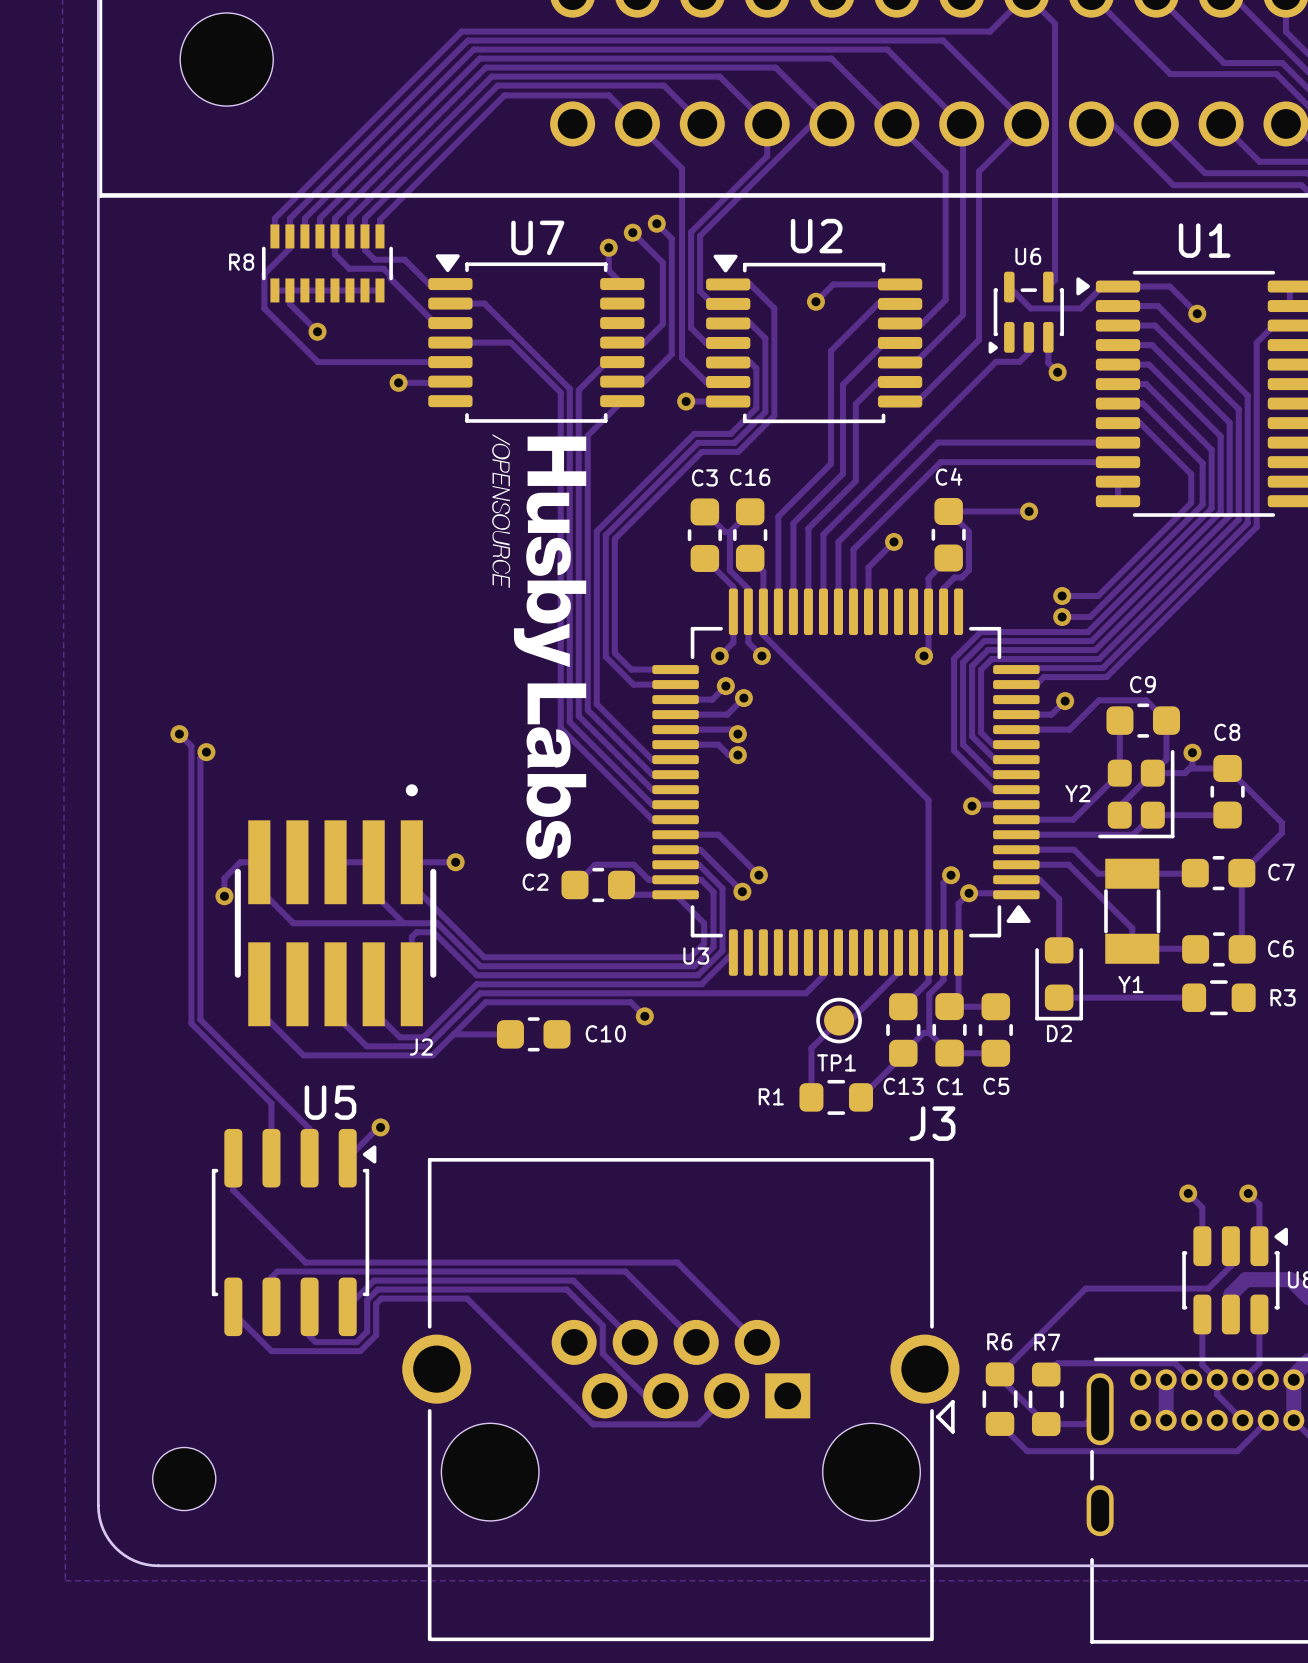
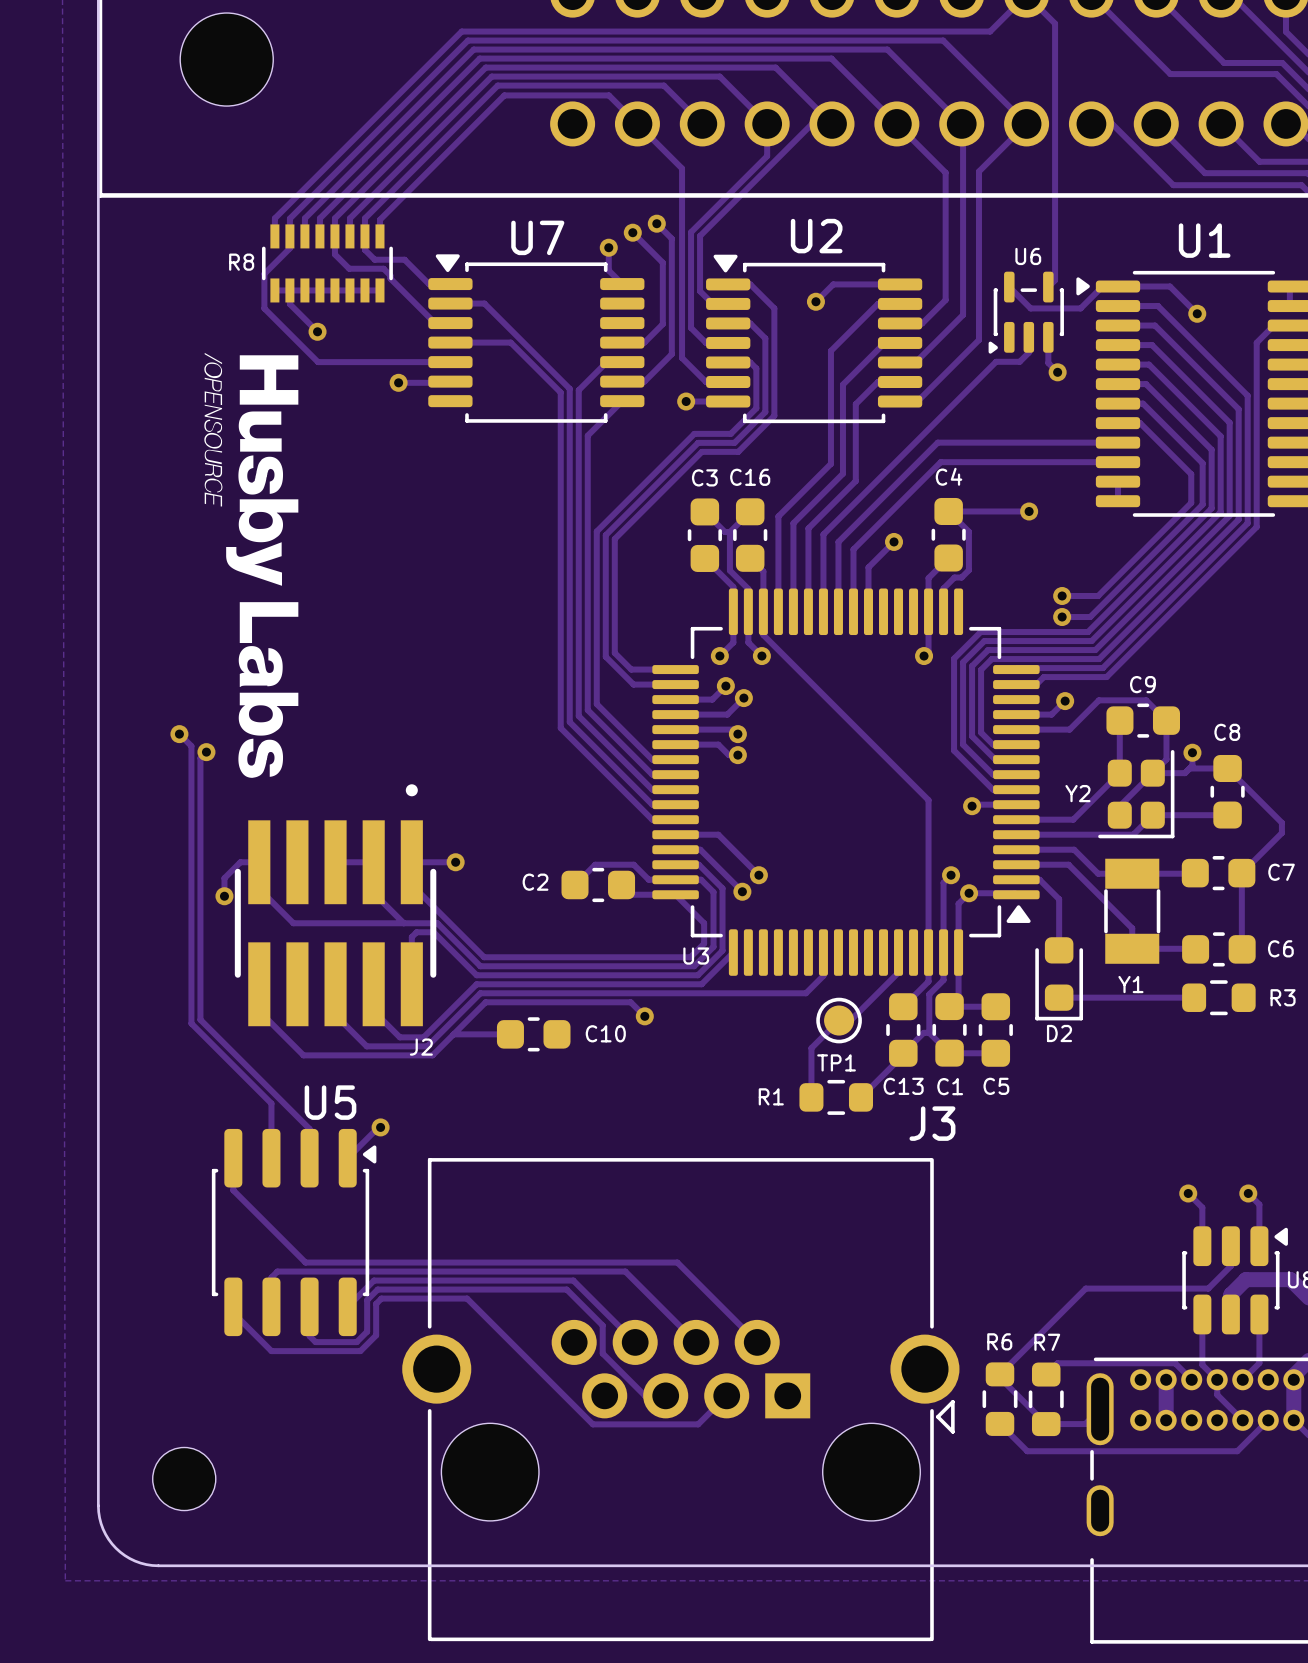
drawing: none -> [204, 362, 223, 449]
drawing position: (501, 439) -> (213, 358)
drawing: [492, 443, 510, 530] -> none
drawing position: (556, 461) -> (269, 379)
drawing position: (501, 465) -> (213, 384)
drawing: none -> [204, 492, 299, 543]
drawing position: (501, 493) -> (213, 412)
drawing position: (501, 507) -> (213, 426)
drawing position: (548, 512) -> (260, 431)
drawing position: (501, 538) -> (213, 457)
drawing position: (501, 551) -> (213, 470)
drawing position: (548, 556) -> (260, 474)
drawing position: (501, 566) -> (213, 485)
drawing: [492, 573, 587, 624] -> none
drawing position: (541, 645) -> (254, 564)
drawing: none -> [238, 692, 299, 736]
drawing position: (556, 703) -> (269, 622)
drawing position: (548, 747) -> (260, 666)
drawing: [526, 774, 587, 817] -> none
drawing position: (548, 839) -> (260, 758)

